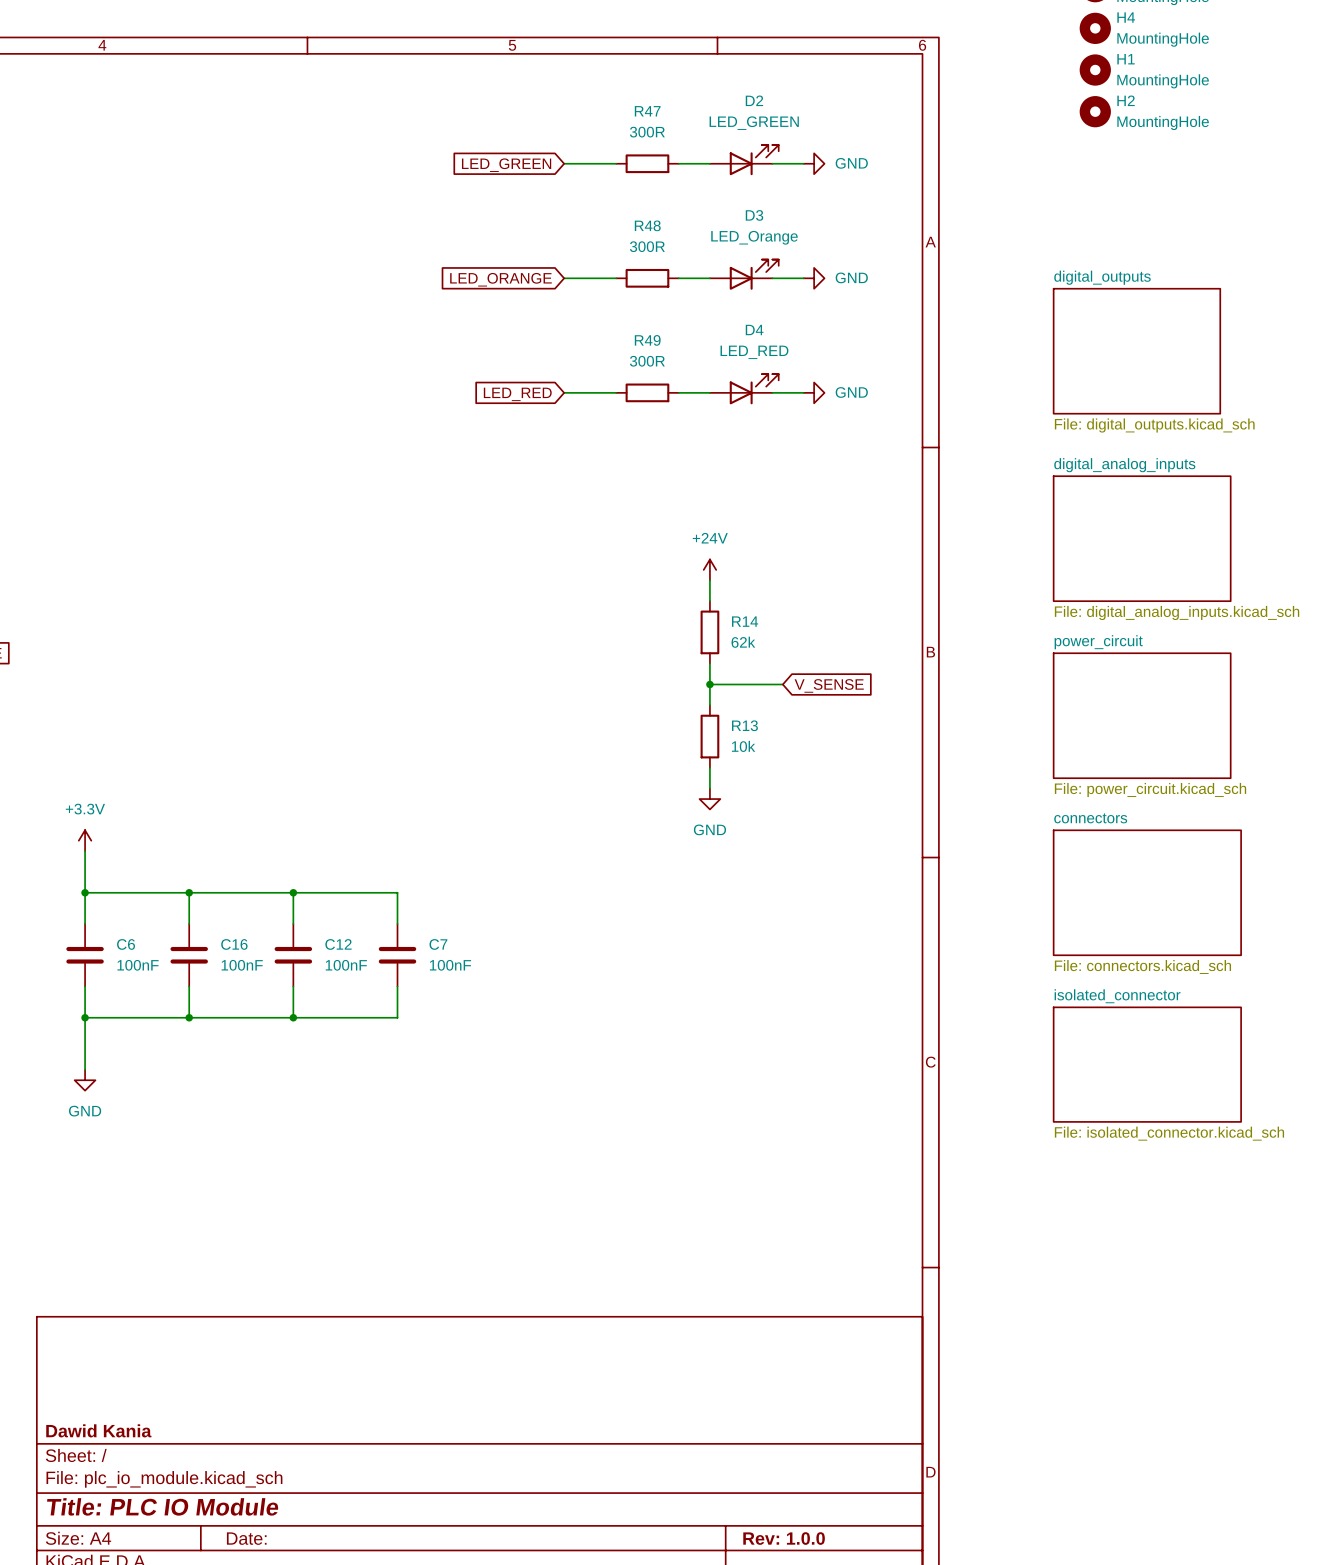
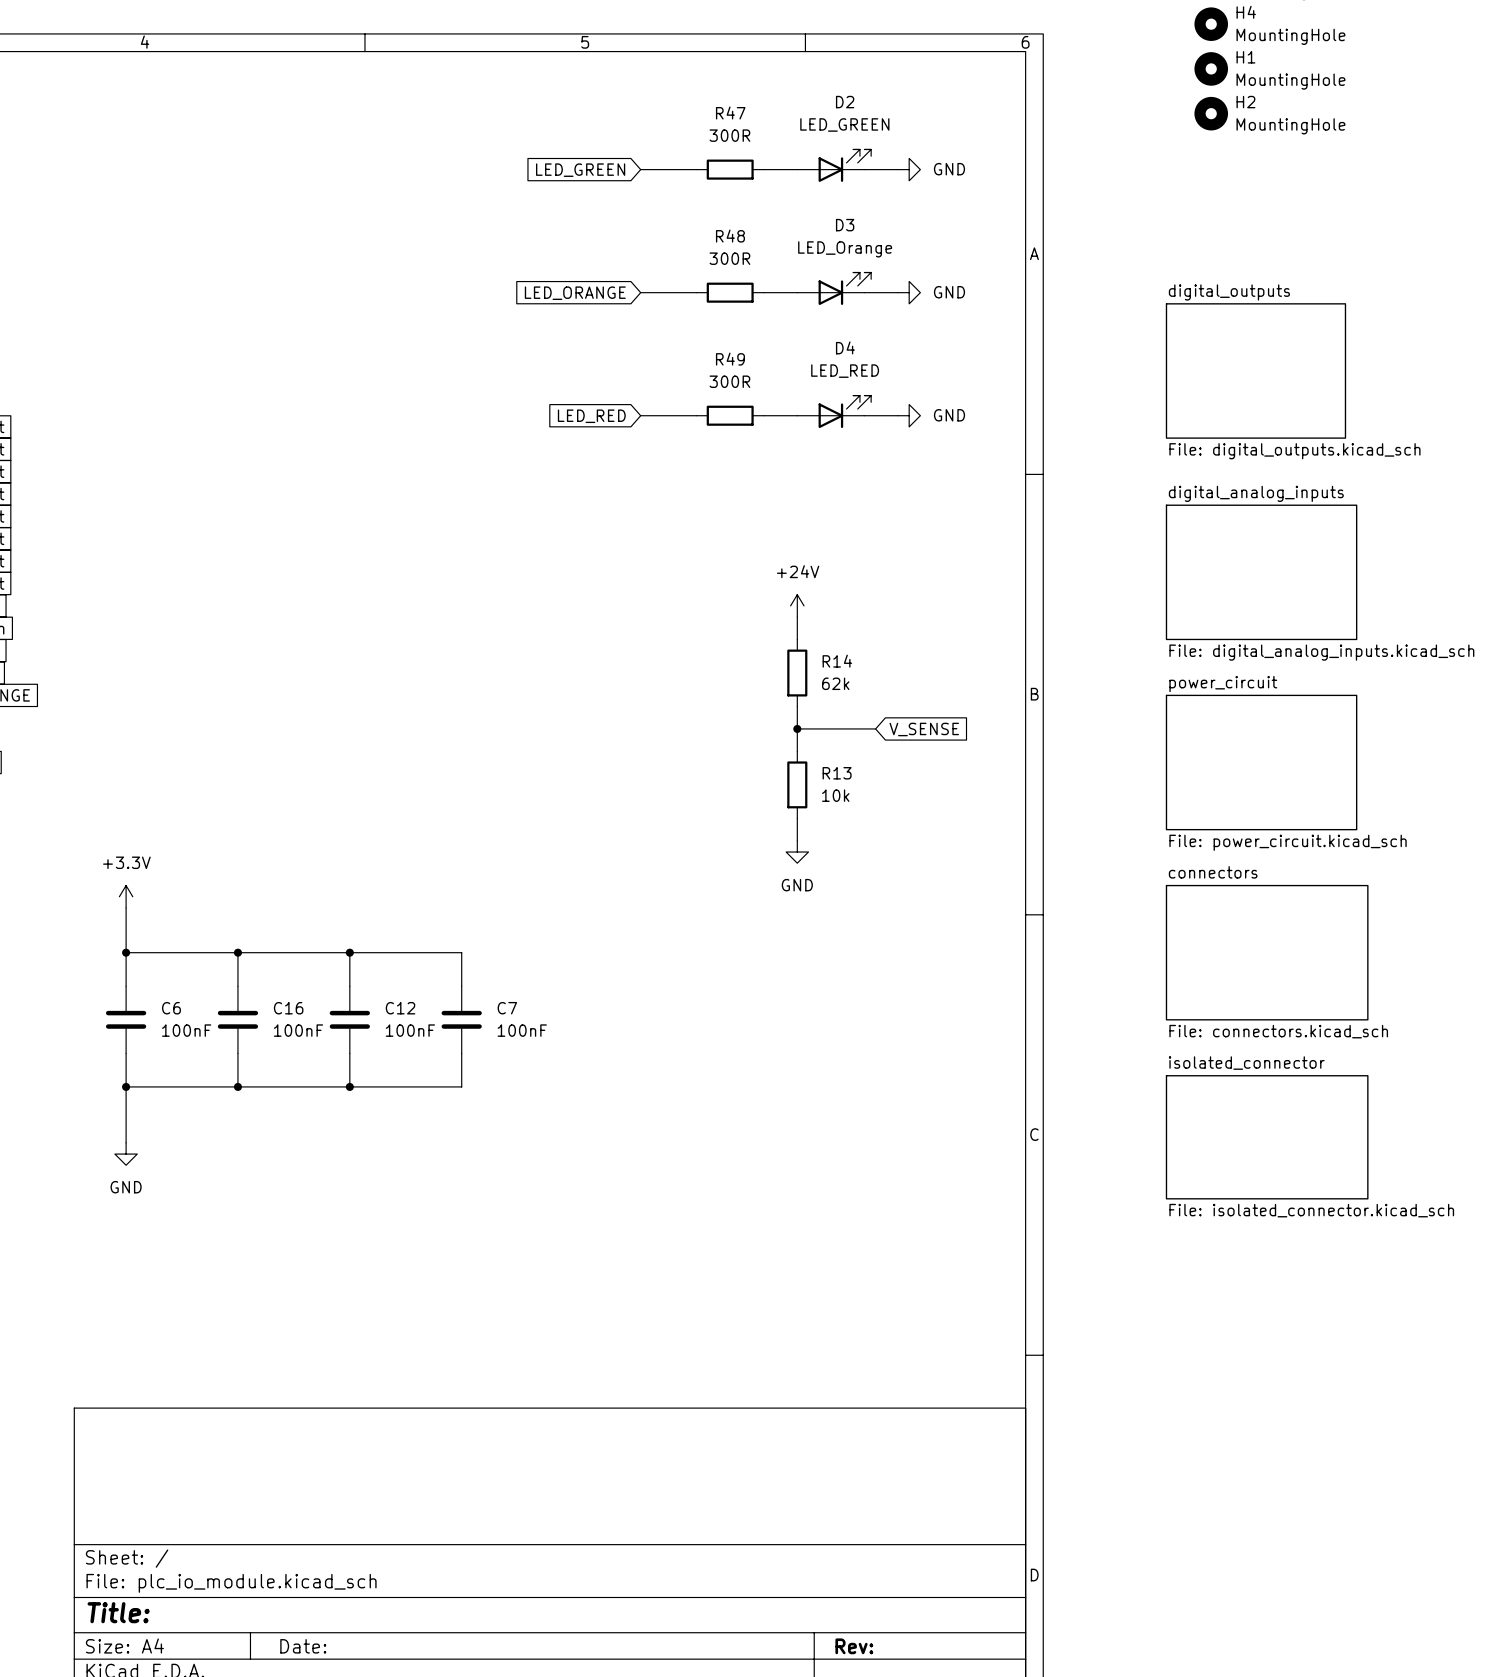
title block: Dawid Kania (98, 1430) -> none
title block: Title: PLC IO Module (162, 1506) -> Title: (118, 1612)
title block: Rev: 1.0.0 (784, 1538) -> Rev: (854, 1646)

